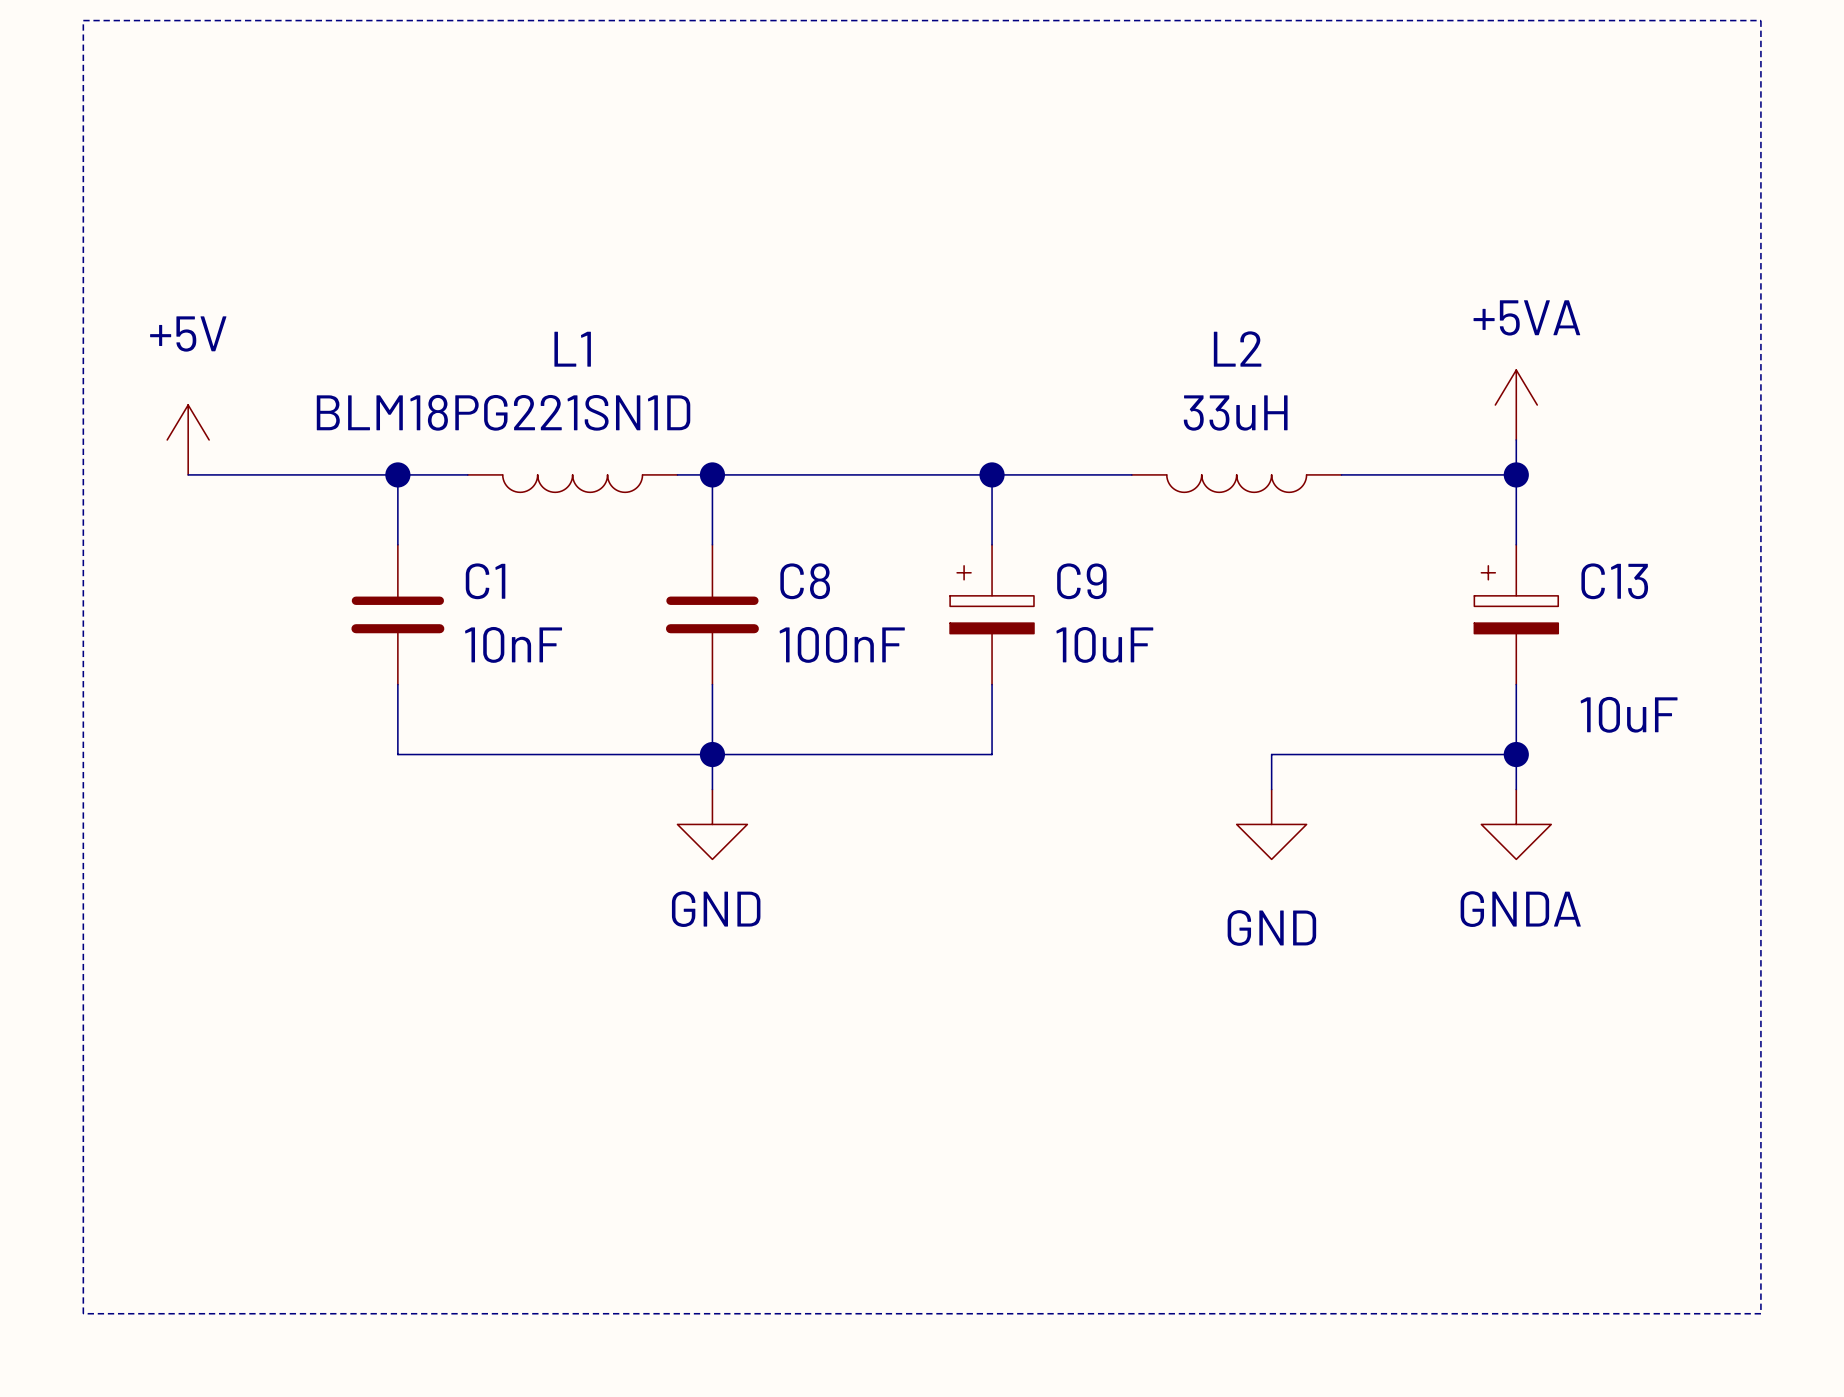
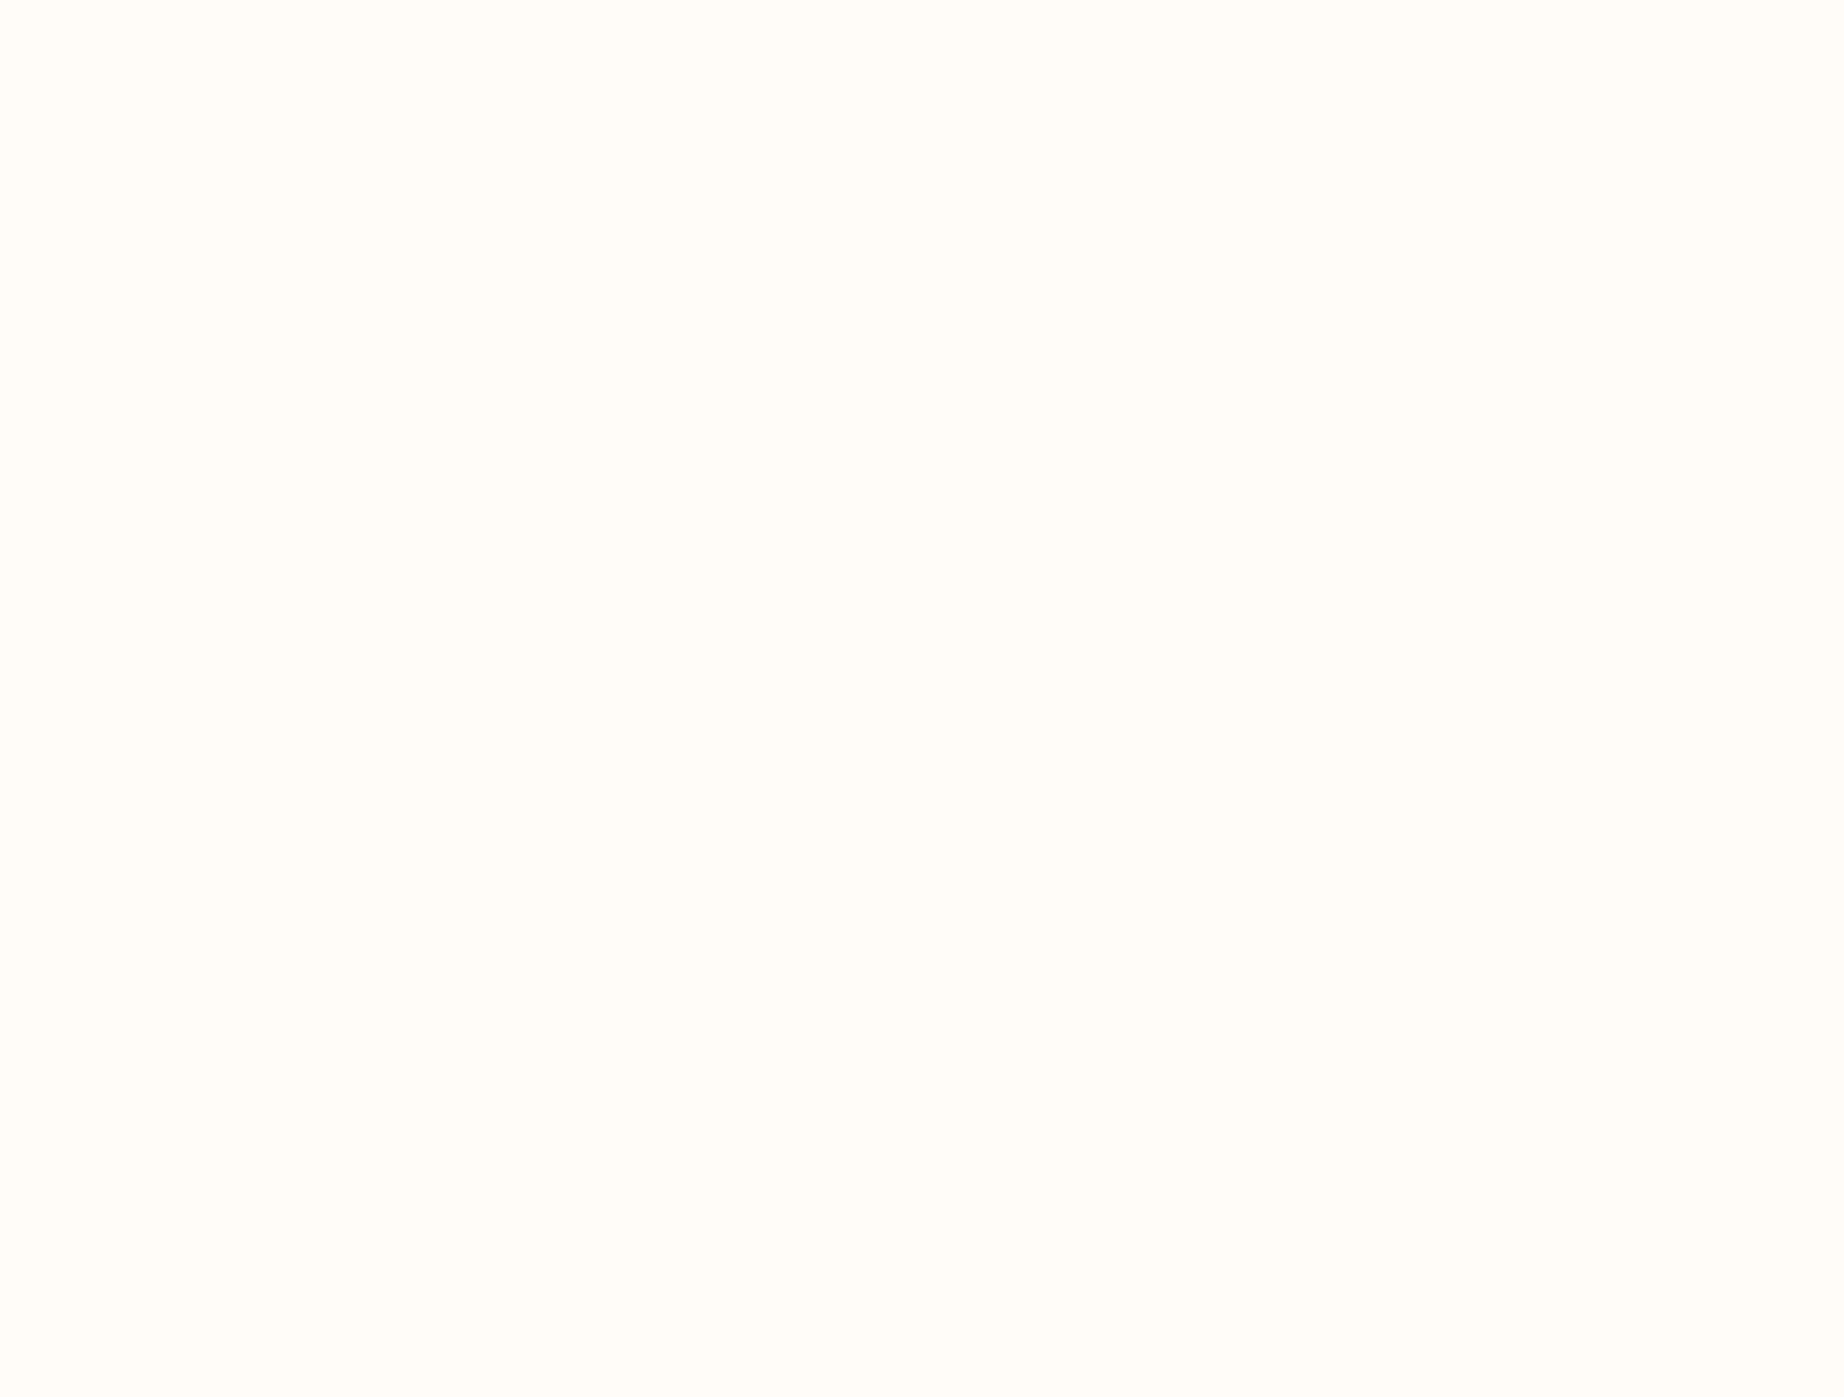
line: (83, 20) (83, 1313) (1760, 1313) (1760, 20) (83, 20) -> none
power symbol: +5VA (1516, 405) -> none
power symbol: +5V (188, 439) -> none
wire: (1516, 439) (1516, 544) -> none
wire: (188, 474) (467, 474) -> none
wire: (397, 474) (397, 544) -> none
junction: (397, 474) -> none
wire: (677, 474) (1131, 474) -> none
wire: (712, 474) (712, 544) -> none
junction: (712, 474) -> none
wire: (992, 474) (992, 544) -> none
junction: (992, 474) -> none
wire: (1341, 474) (1516, 474) -> none
junction: (1516, 474) -> none
L1: BLM18PG221SN1D (572, 483) -> none
L2: 33uH (1236, 483) -> none
C1: 10nF (397, 614) -> none
C8: 100nF (712, 614) -> none
C9: 10uF (992, 614) -> none
C13: 10uF (1516, 614) -> none
wire: (397, 684) (397, 754) (992, 754) (992, 684) -> none
wire: (712, 684) (712, 789) -> none
wire: (1516, 684) (1516, 789) -> none
junction: (712, 754) -> none
wire: (1516, 754) (1271, 754) (1271, 789) -> none
junction: (1516, 754) -> none
power symbol: GND (712, 824) -> none
power symbol: GND (1271, 824) -> none
power symbol: GNDA (1516, 824) -> none

